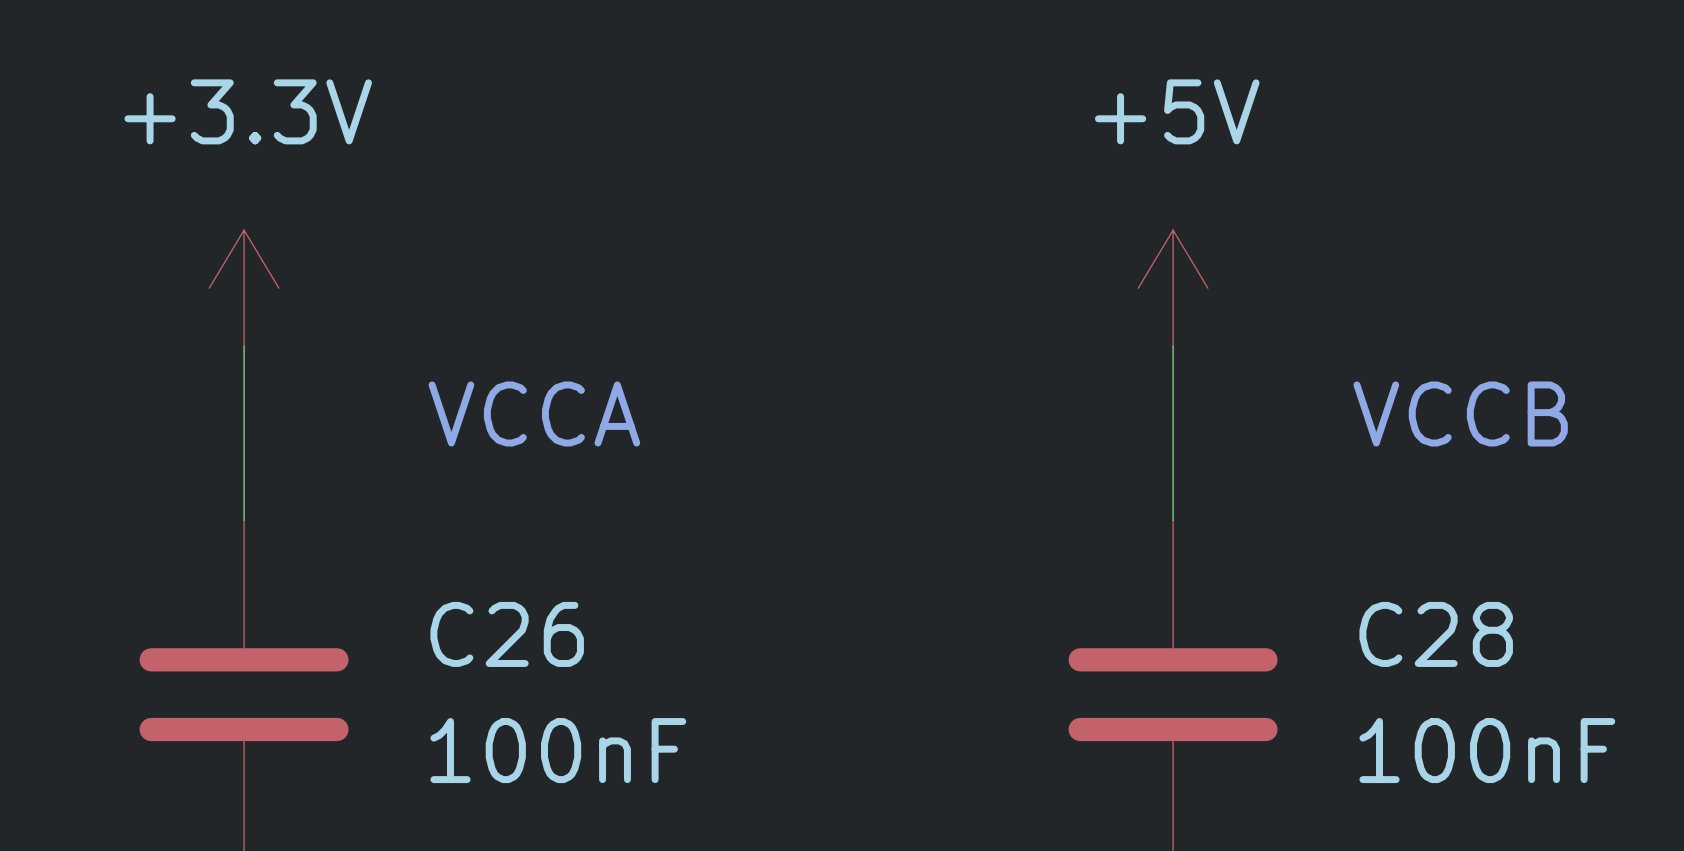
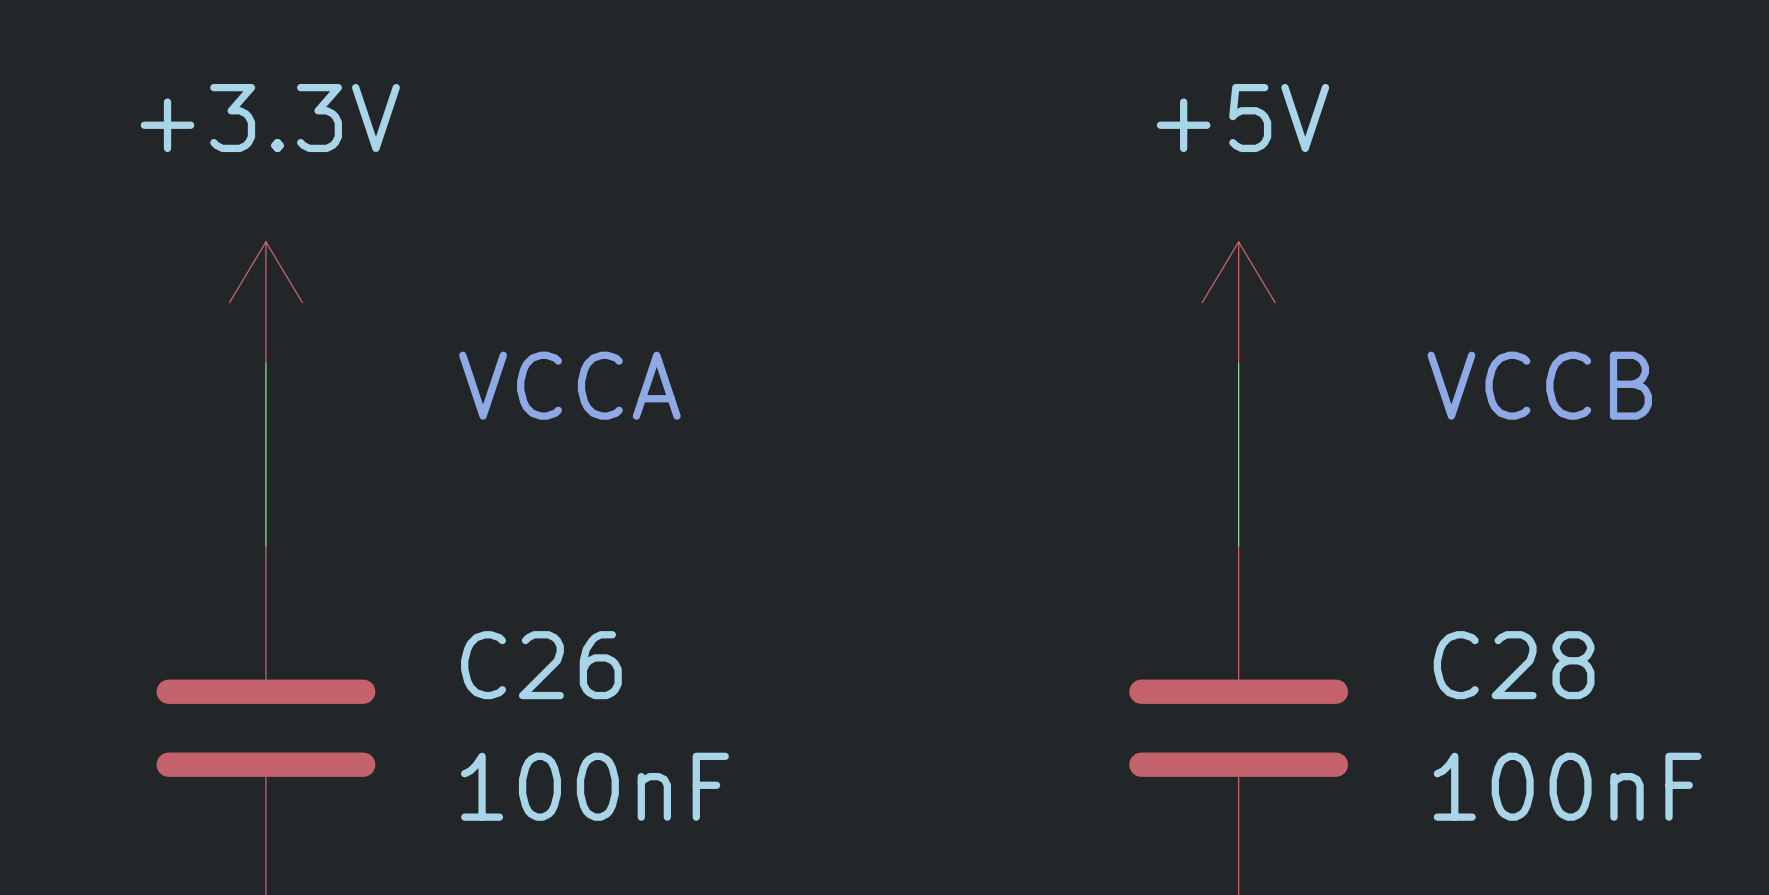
text position: VCCA (534, 413) -> VCCA (569, 385)
text position: VCCB (1460, 413) -> VCCB (1539, 385)

